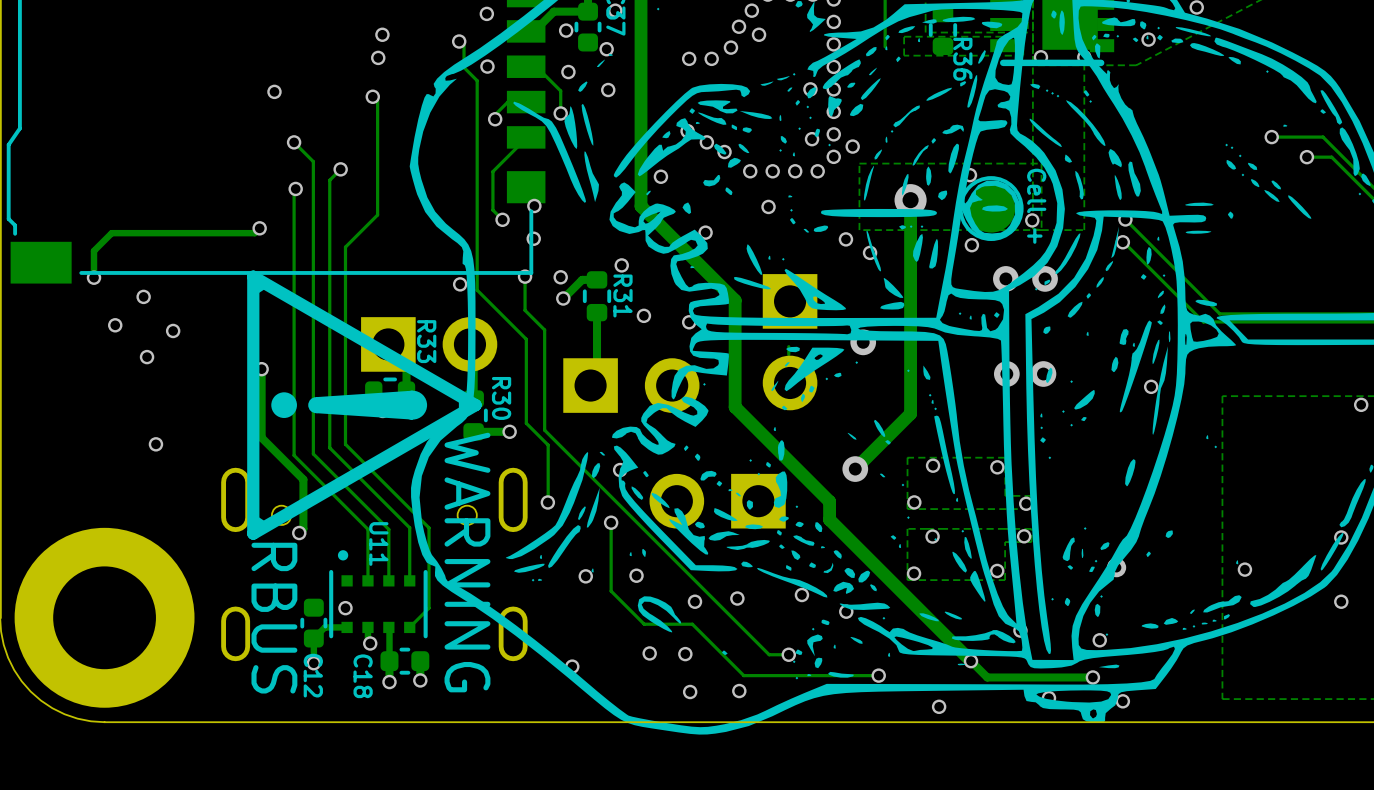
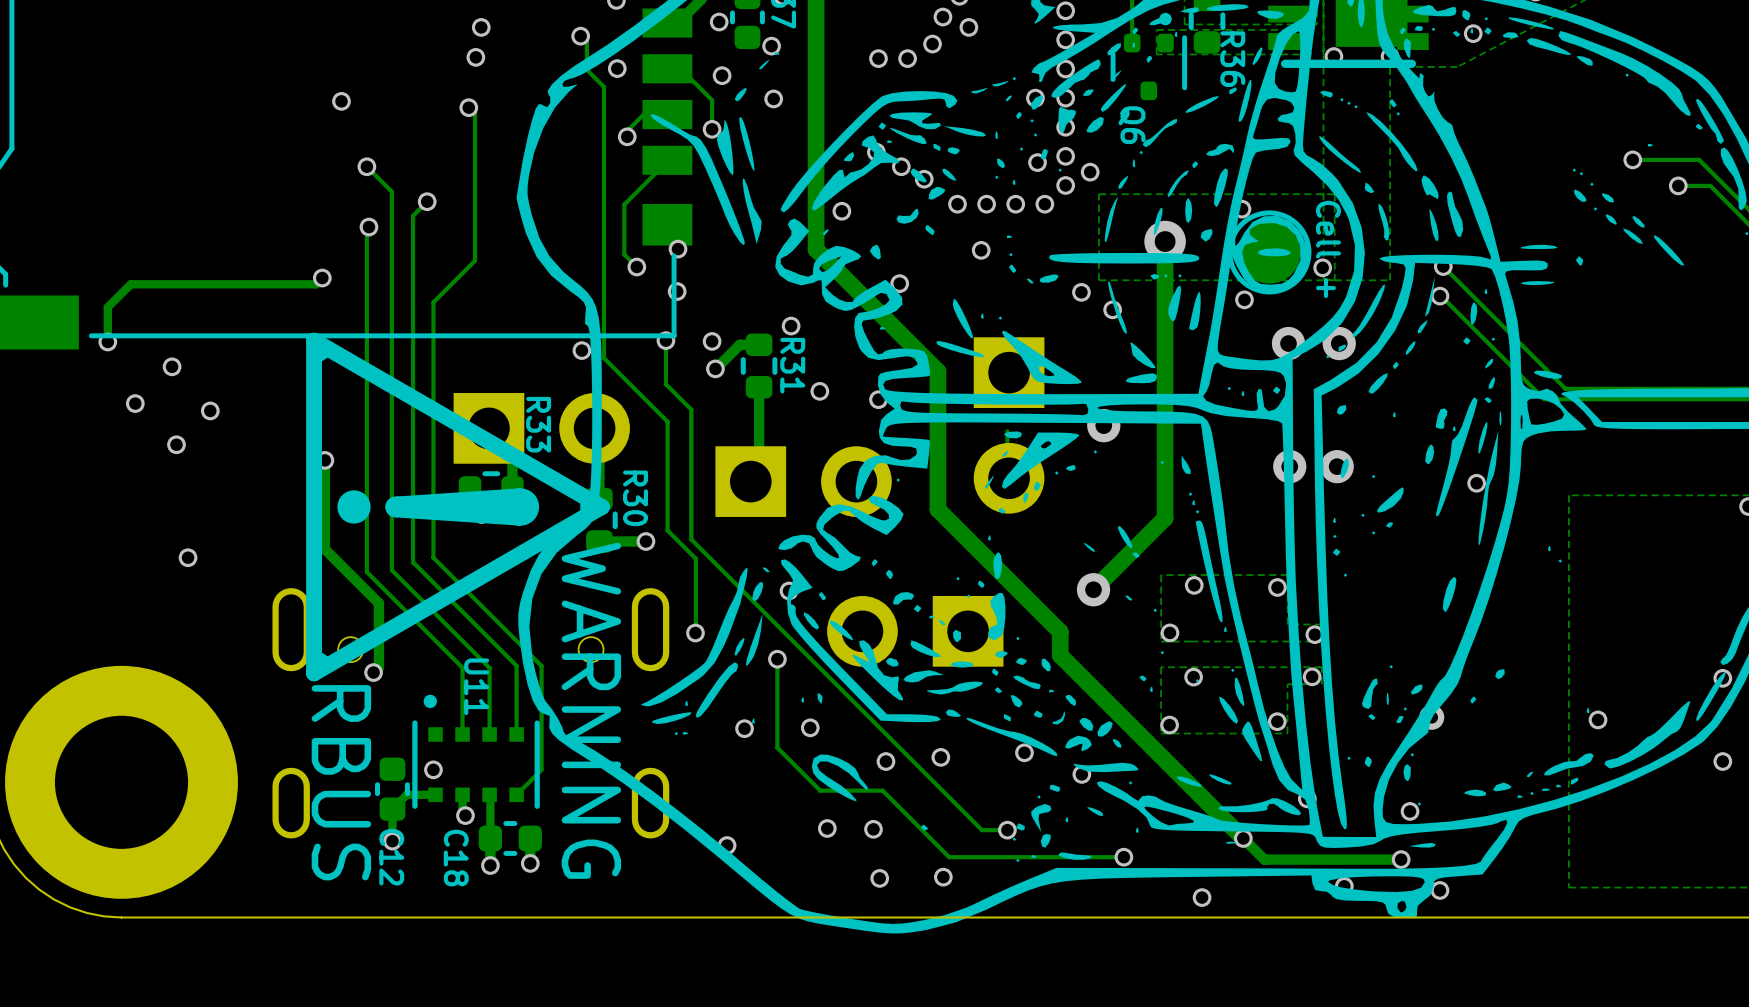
Q6: none -> (1148, 56)

